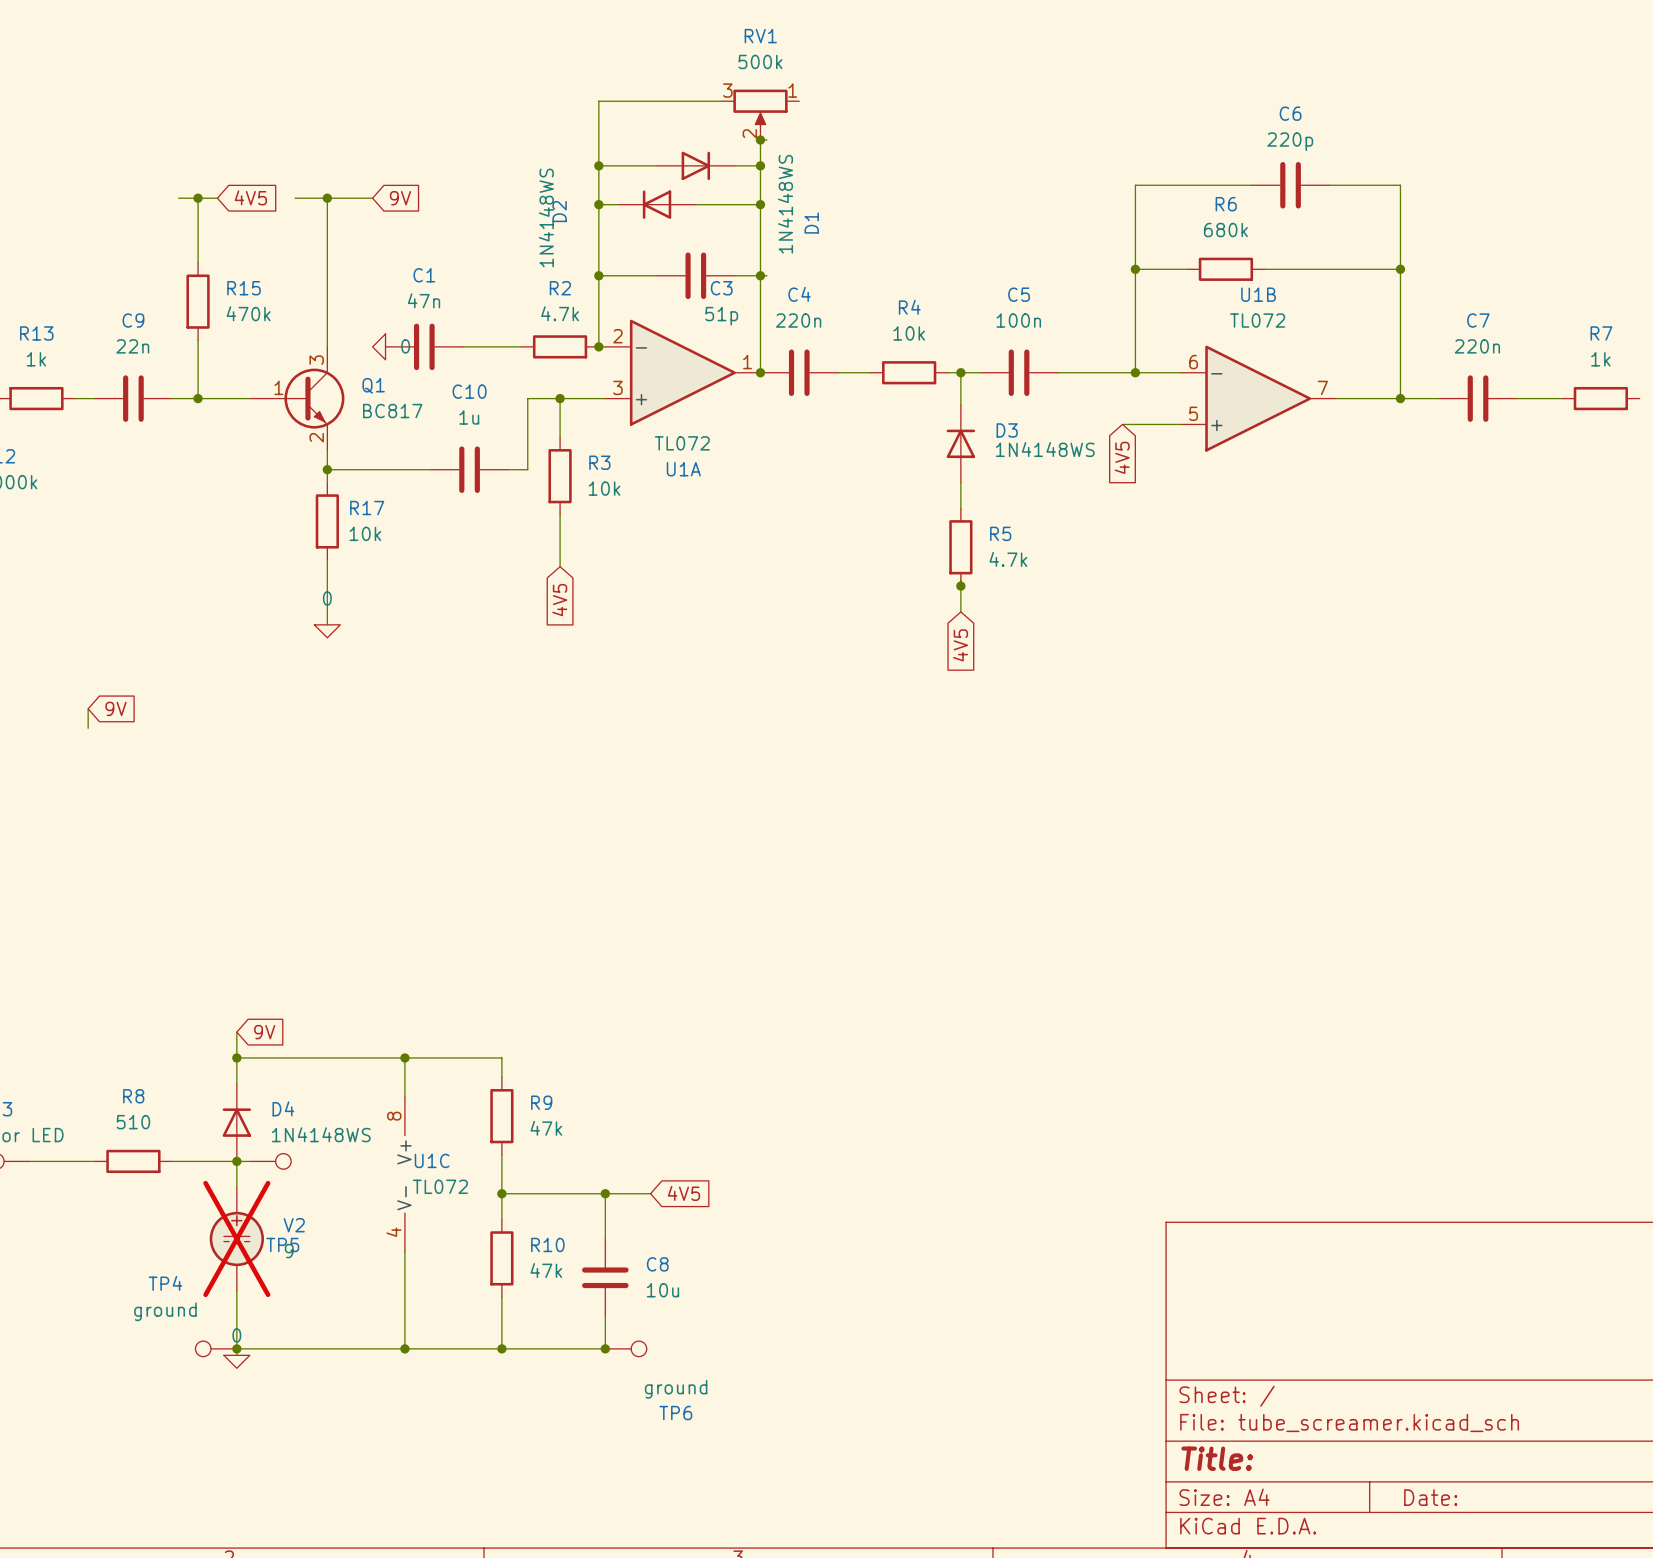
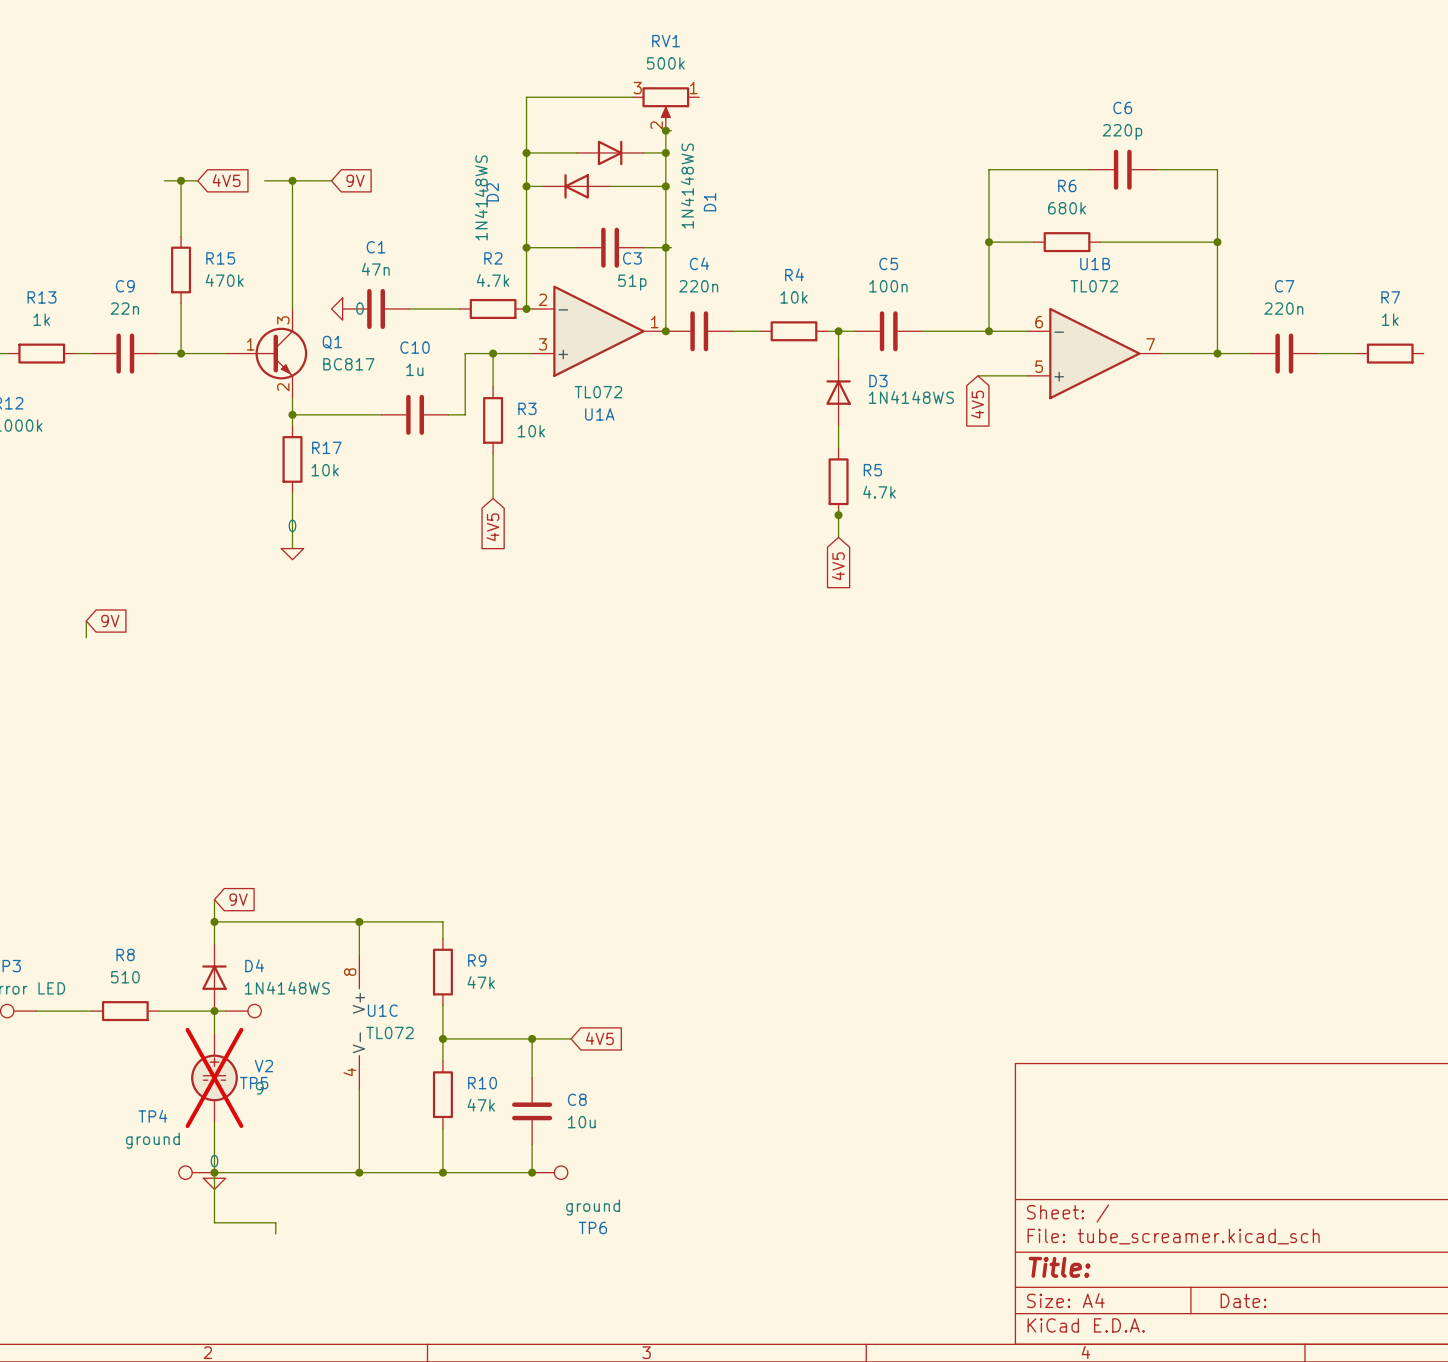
wire: none -> (214, 1178) (214, 1222) (275, 1222) (275, 1233)

